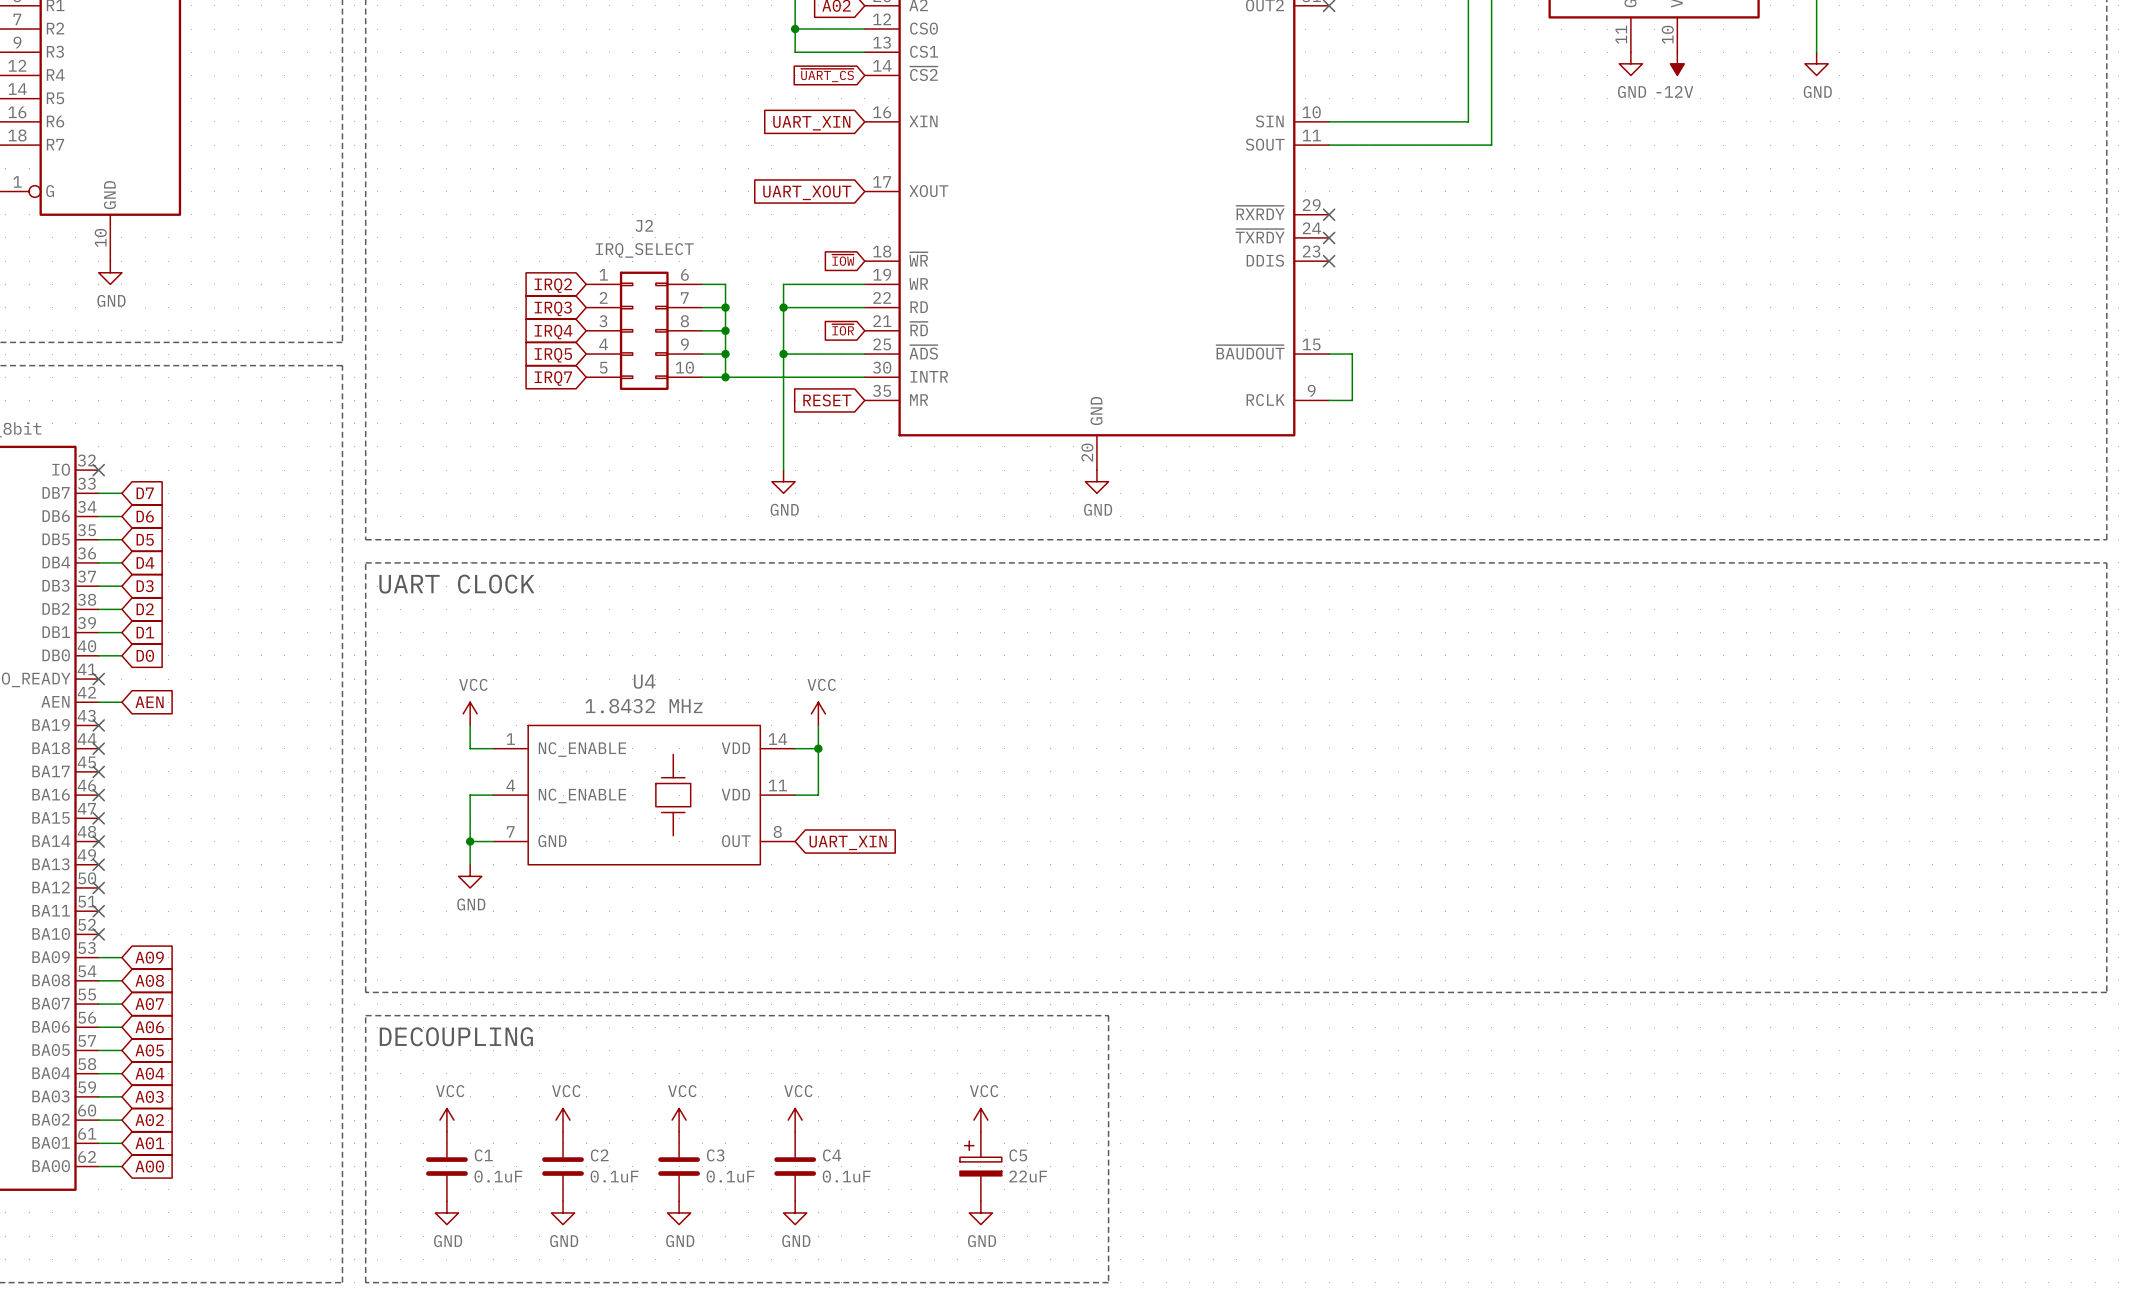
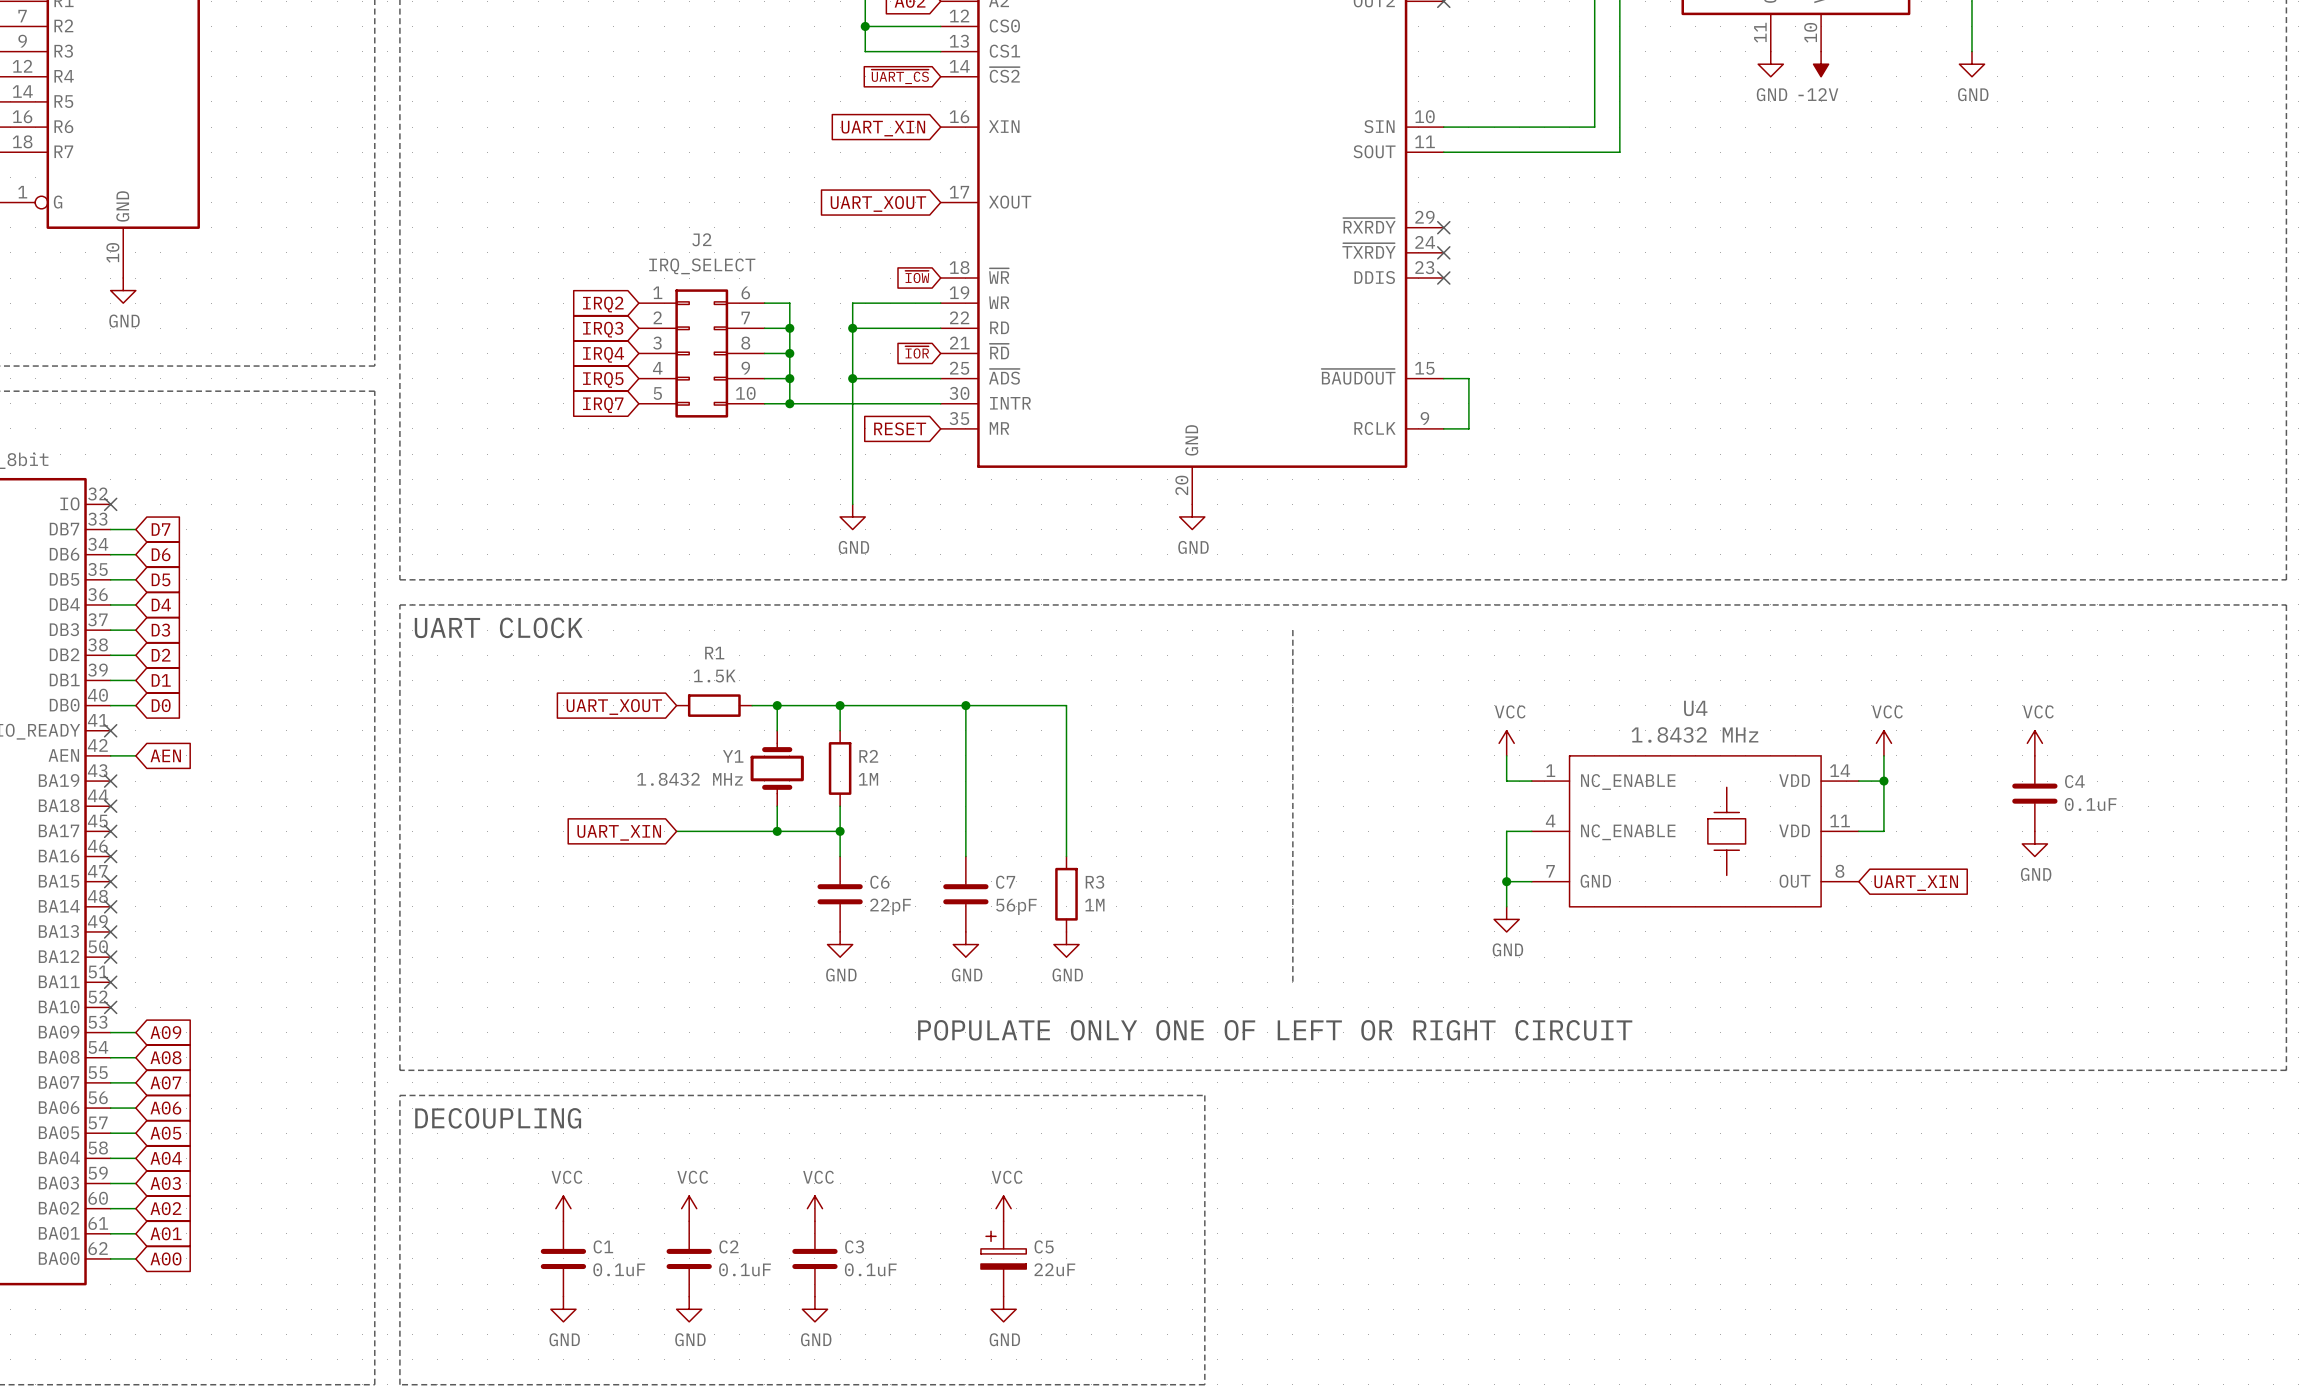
line: none -> (1292, 630) (1292, 982)
R1: none -> 1.5K (714, 705)
wire: none -> (752, 705) (1066, 705) (1066, 856)
wire: none -> (777, 705) (777, 730)
junction: none -> (777, 705)
wire: none -> (840, 705) (840, 730)
junction: none -> (840, 705)
wire: none -> (965, 705) (965, 856)
junction: none -> (965, 705)
global label: none -> UART_XOUT (614, 707)
power symbol: none -> VCC (1506, 743)
power symbol: none -> VCC (1883, 743)
power symbol: none -> VCC (2034, 743)
wire: none -> (1506, 755) (1506, 781) (1531, 781)
wire: none -> (1883, 755) (1883, 831) (1858, 831)
power symbol: VCC (470, 713) -> none
Y1: none -> 1.8432 MHz (777, 768)
R2: none -> 1M (840, 768)
power symbol: VCC (818, 713) -> none
wire: (470, 725) (470, 748) (493, 748) -> none
wire: (818, 725) (818, 795) (795, 795) -> none
wire: none -> (1858, 781) (1883, 781)
junction: none -> (1883, 781)
wire: none -> (777, 806) (777, 831)
wire: none -> (840, 806) (840, 856)
wire: (795, 748) (818, 748) -> none
junction: (818, 748) -> none
wire: none -> (676, 831) (840, 831)
junction: none -> (777, 831)
junction: none -> (840, 831)
wire: none -> (1531, 831) (1506, 831) (1506, 906)
power symbol: none -> GND (2034, 843)
wire: (493, 795) (470, 795) (470, 864) -> none
U4 position: (644, 795) -> (1695, 831)
wire: none -> (1506, 881) (1531, 881)
junction: none -> (1506, 881)
global label: none -> UART_XIN (1916, 883)
C6: none -> 22pF (840, 894)
C7: none -> 56pF (965, 894)
R3: none -> 1M (1066, 894)
wire: (470, 841) (493, 841) -> none
junction: (470, 841) -> none
global label rotation: 0° (848, 842) -> 180° (619, 832)
global label position: UART_XIN (848, 842) -> UART_XIN (619, 832)
power symbol: none -> GND (1506, 919)
power symbol: GND (470, 876) -> none
power symbol: none -> GND (840, 944)
power symbol: none -> GND (965, 944)
power symbol: none -> GND (1066, 944)
text: none -> POPULATE ONLY ONE OF LEFT OR RIGHT CIRCUIT (1275, 1030)
power symbol: VCC (446, 1120) -> none
power symbol: none -> VCC (563, 1208)
power symbol: VCC (563, 1120) -> none
power symbol: none -> VCC (689, 1208)
power symbol: VCC (679, 1120) -> none
power symbol: none -> VCC (814, 1208)
power symbol: VCC (795, 1120) -> none
power symbol position: VCC (980, 1120) -> VCC (1003, 1208)
C1 position: (446, 1166) -> (563, 1258)
C2 position: (563, 1166) -> (689, 1258)
C3 position: (679, 1166) -> (814, 1258)
C4 position: (795, 1166) -> (2034, 793)
C5 position: (980, 1166) -> (1003, 1258)
power symbol: GND (446, 1212) -> none
power symbol: none -> GND (563, 1309)
power symbol: GND (563, 1212) -> none
power symbol: none -> GND (689, 1309)
power symbol: GND (679, 1212) -> none
power symbol: none -> GND (814, 1309)
power symbol: GND (795, 1212) -> none
power symbol position: GND (980, 1212) -> GND (1003, 1309)

